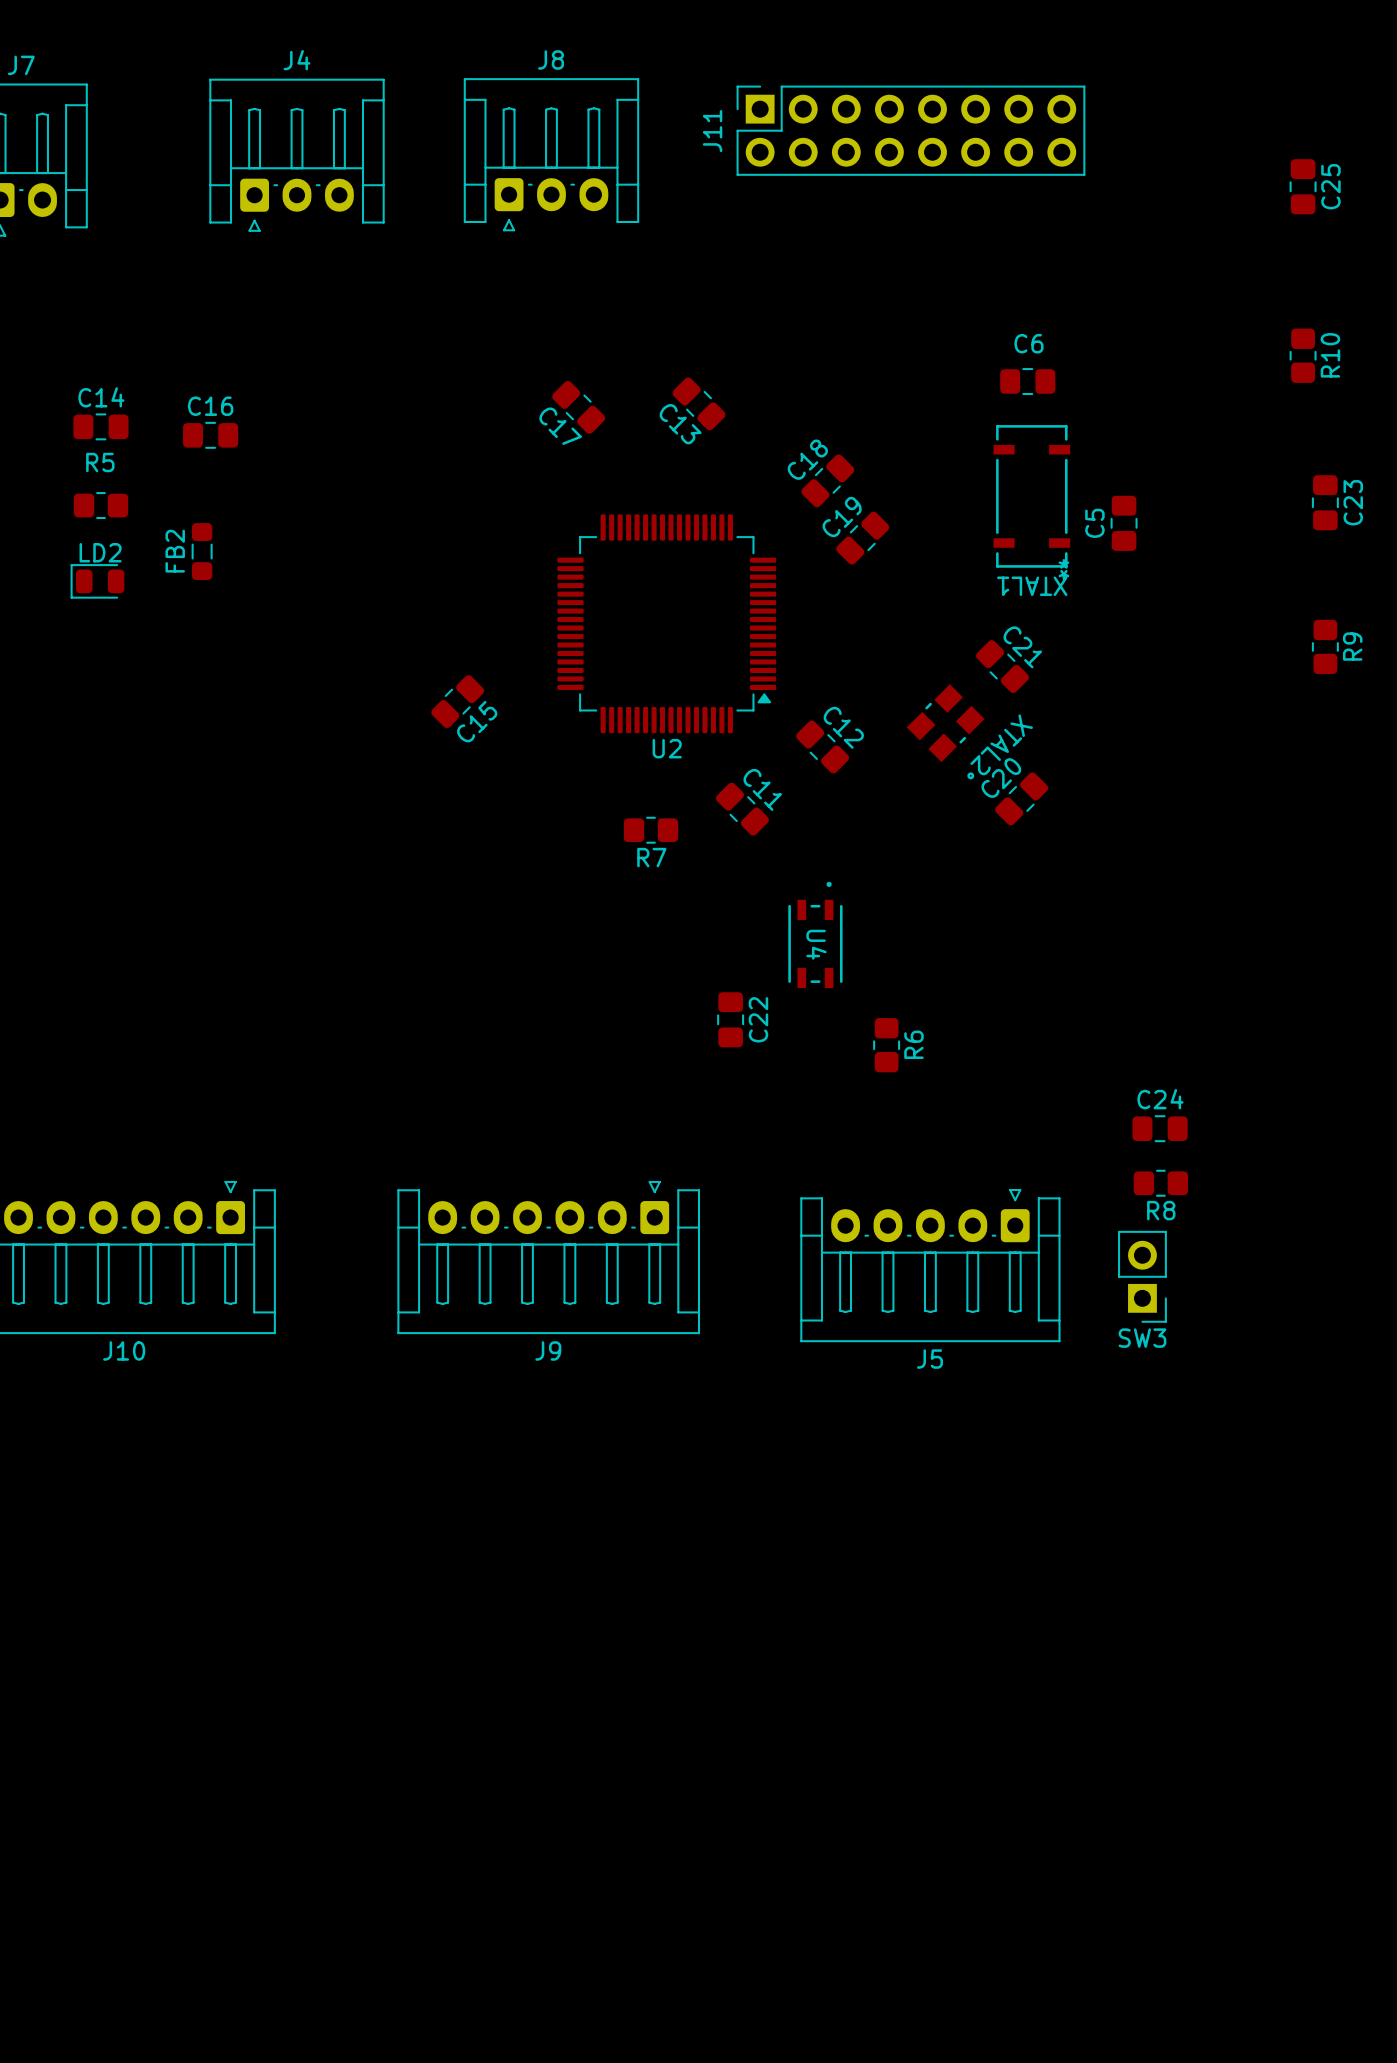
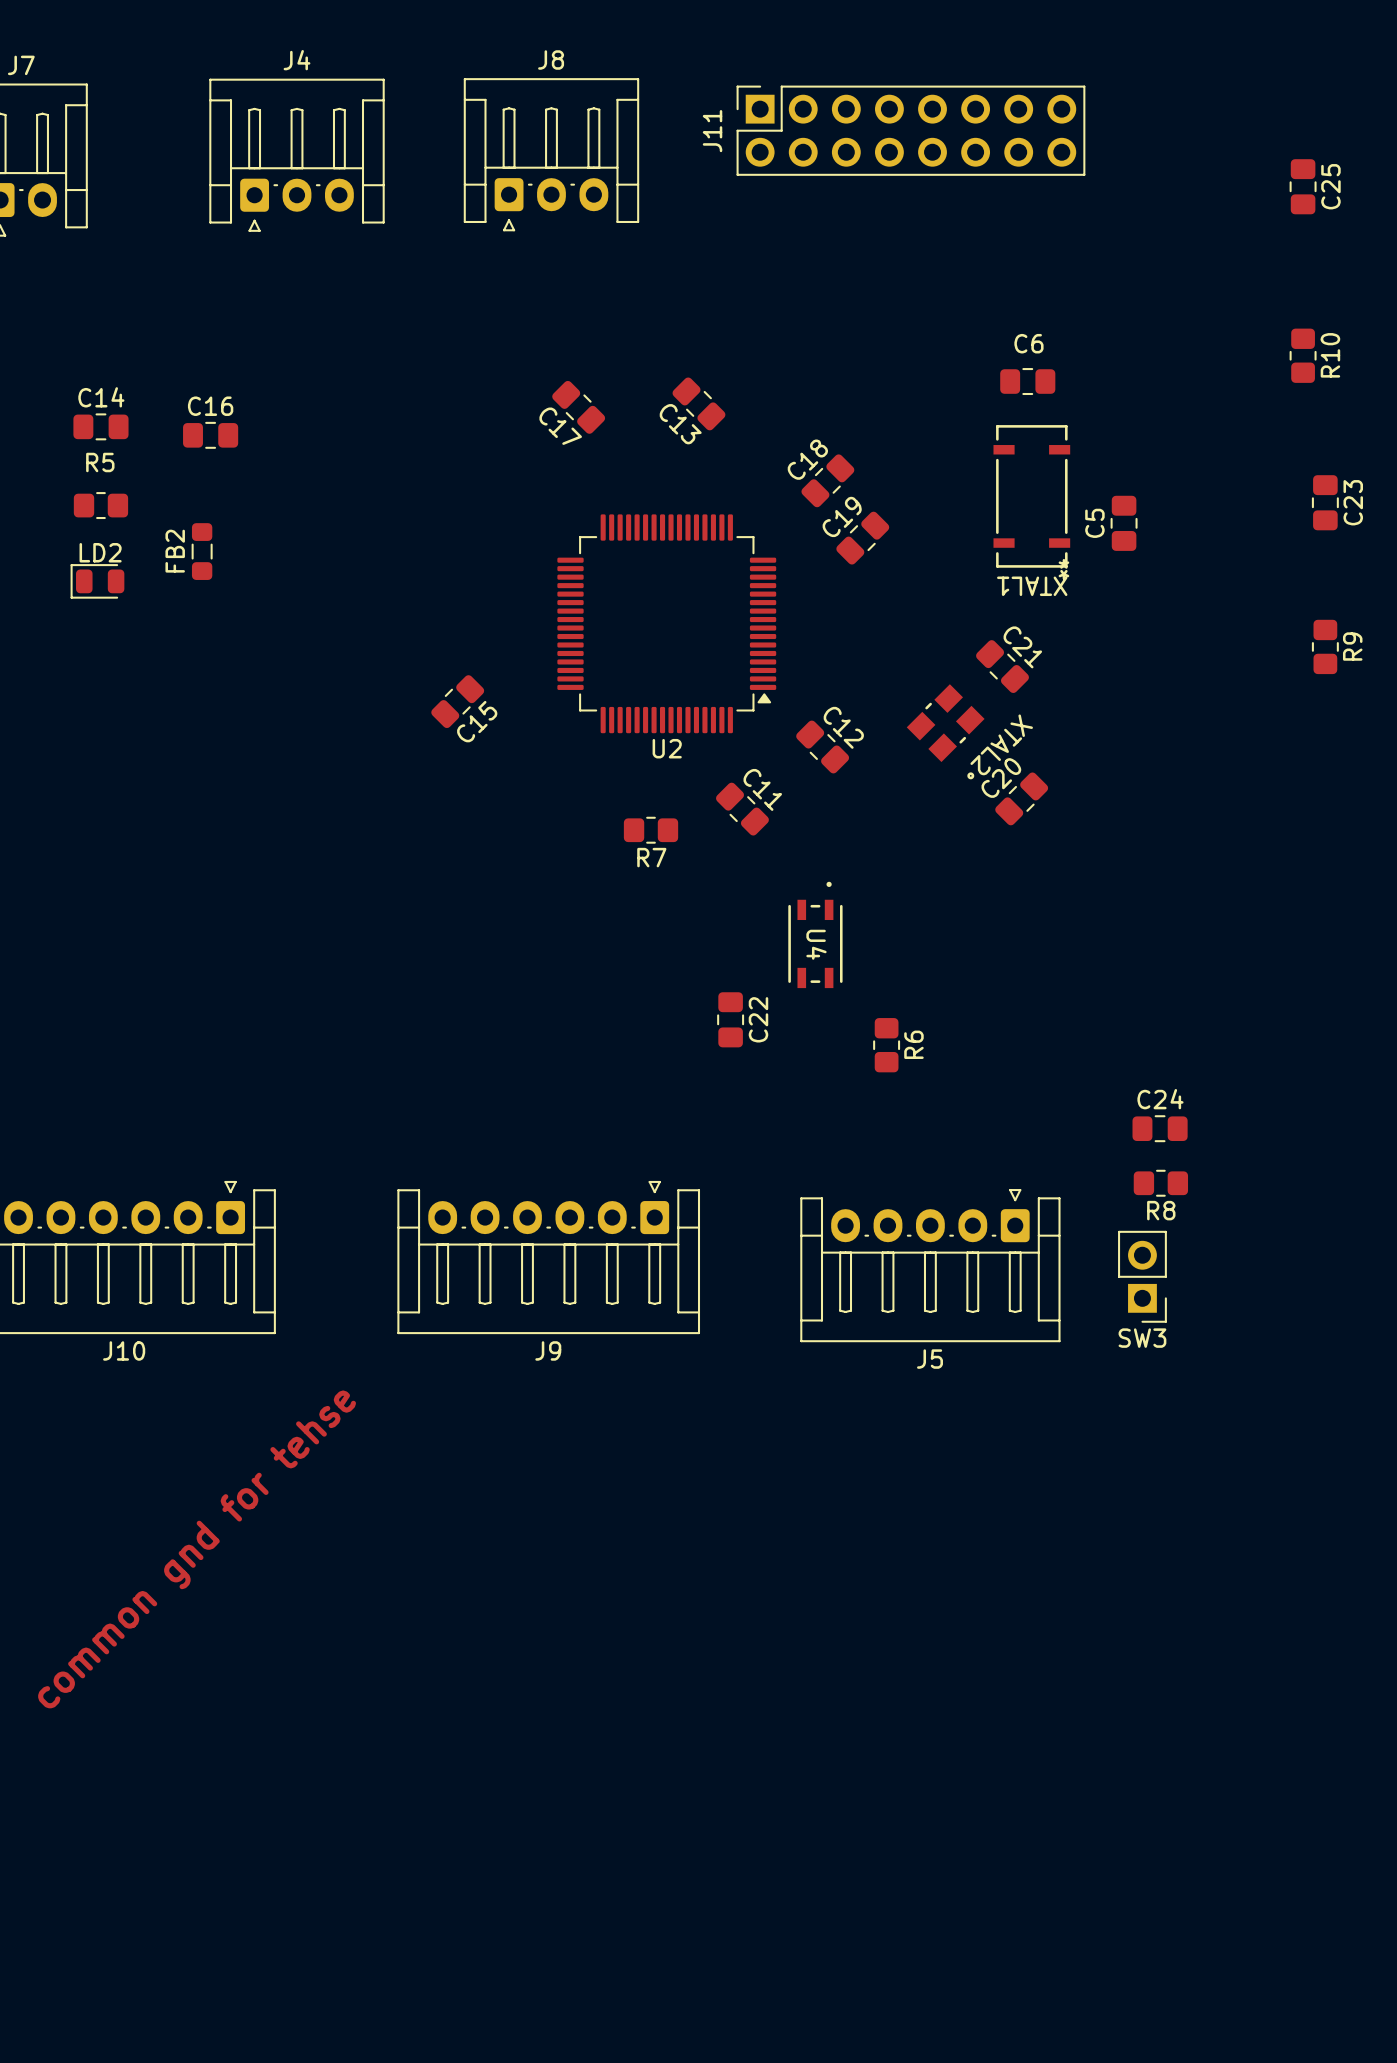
text: none -> common gnd for tehse (197, 1549)

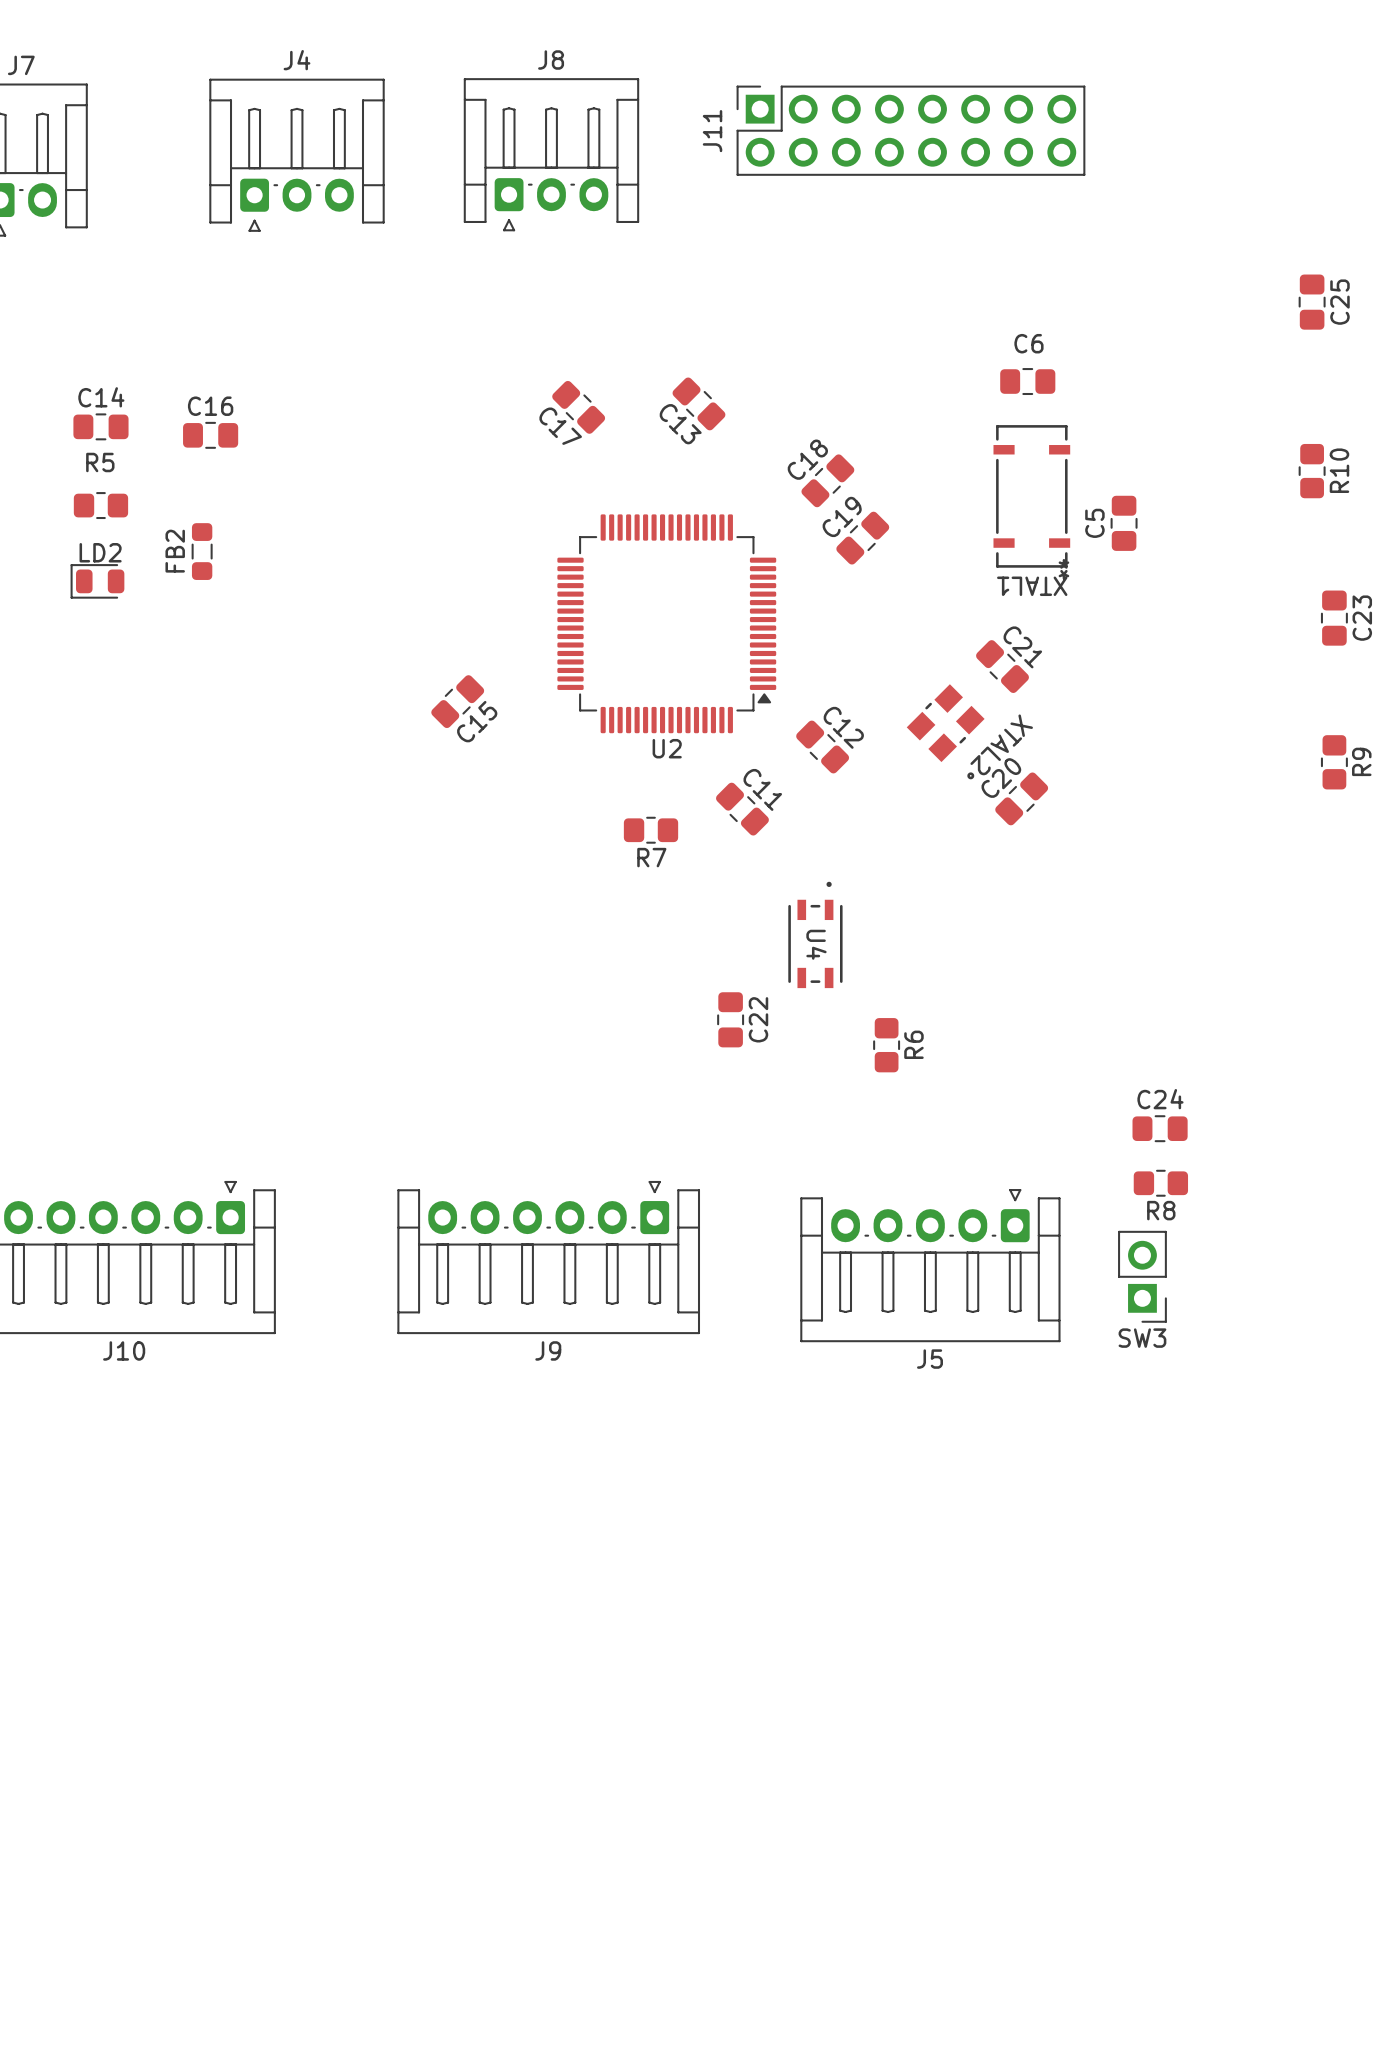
C25 position: (1303, 186) -> (1312, 302)
R10 position: (1303, 355) -> (1312, 471)
C23 position: (1325, 502) -> (1334, 618)
R9 position: (1325, 646) -> (1334, 762)
text: common gnd for tehse (197, 1549) -> none

